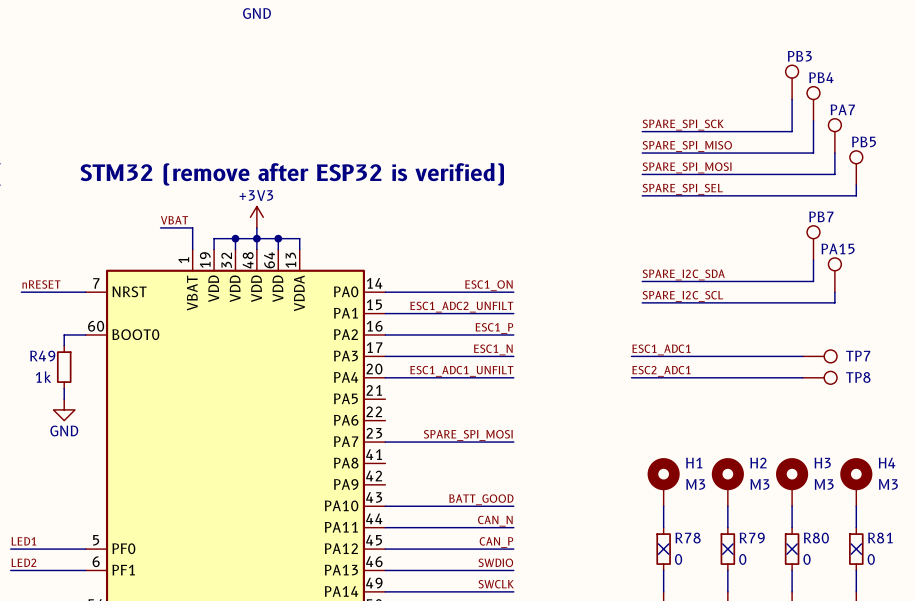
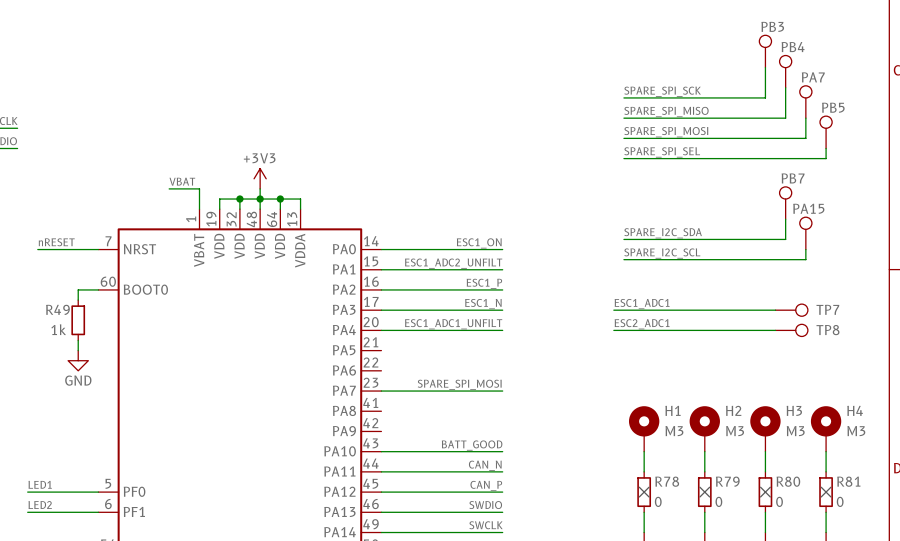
text: STM32 (remove after ESP32 is verified) (292, 174) -> none

